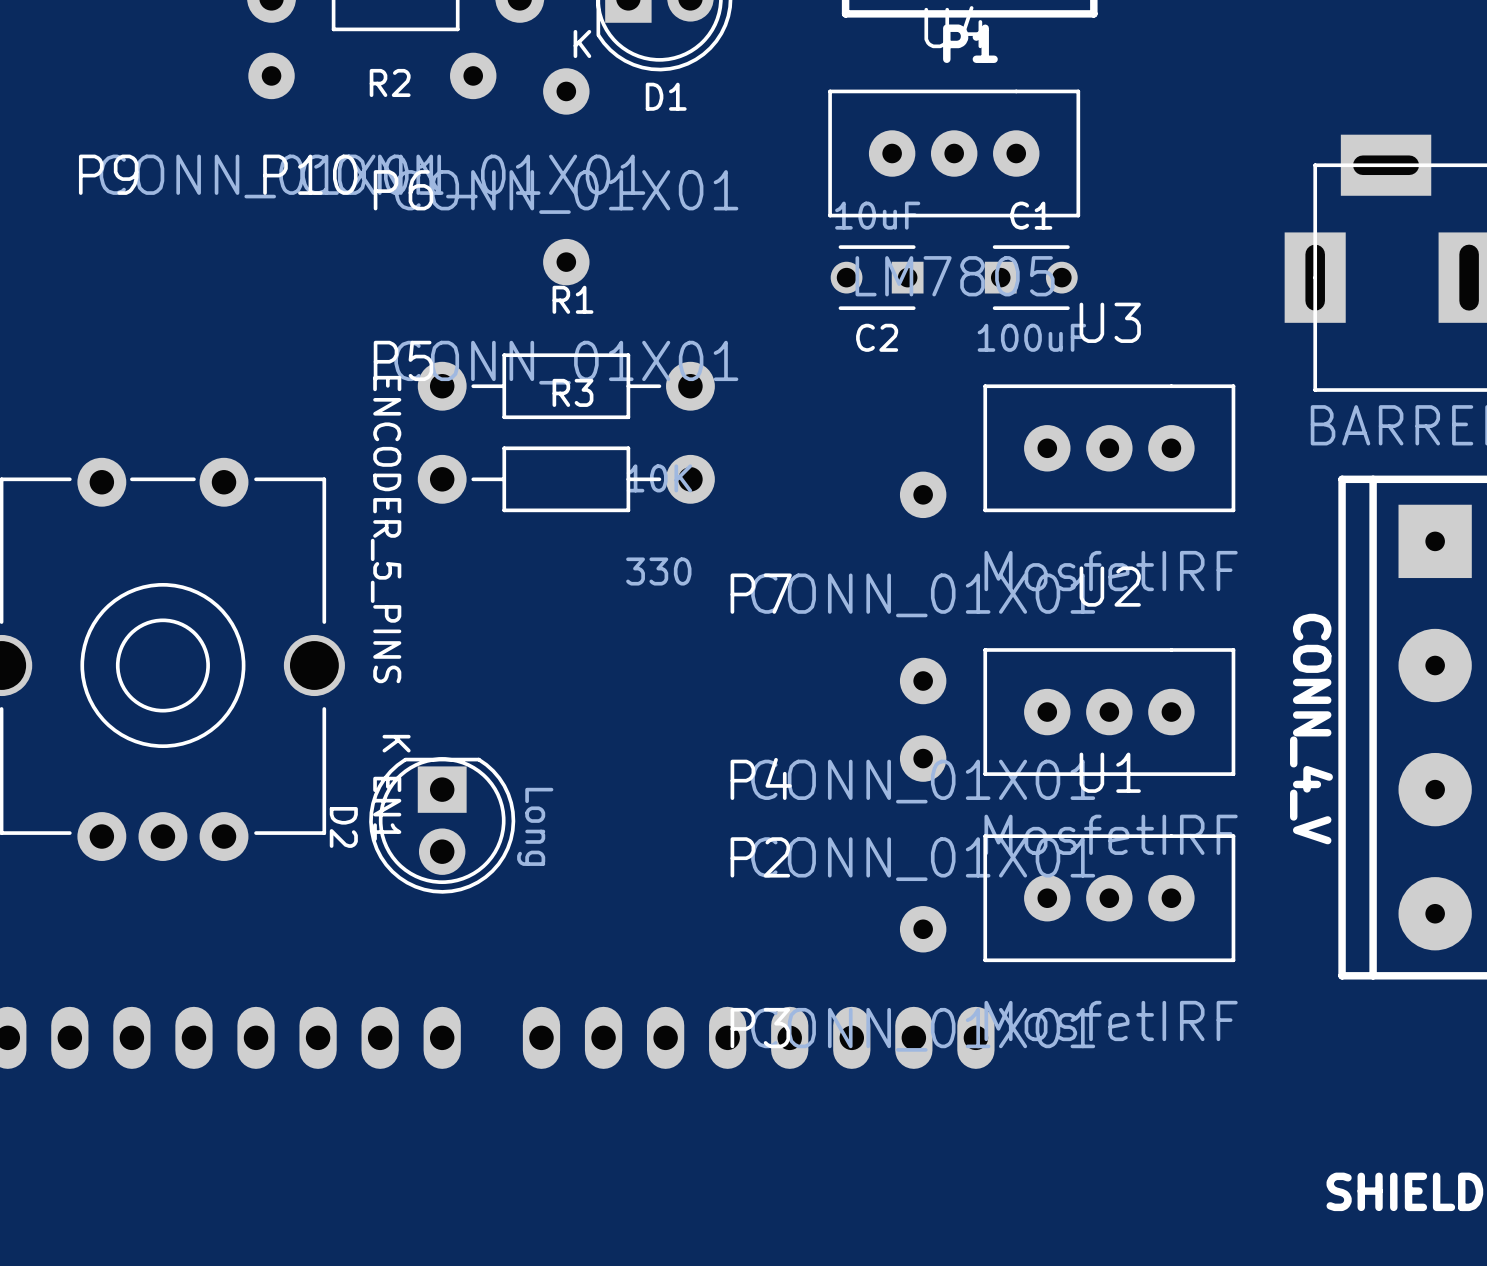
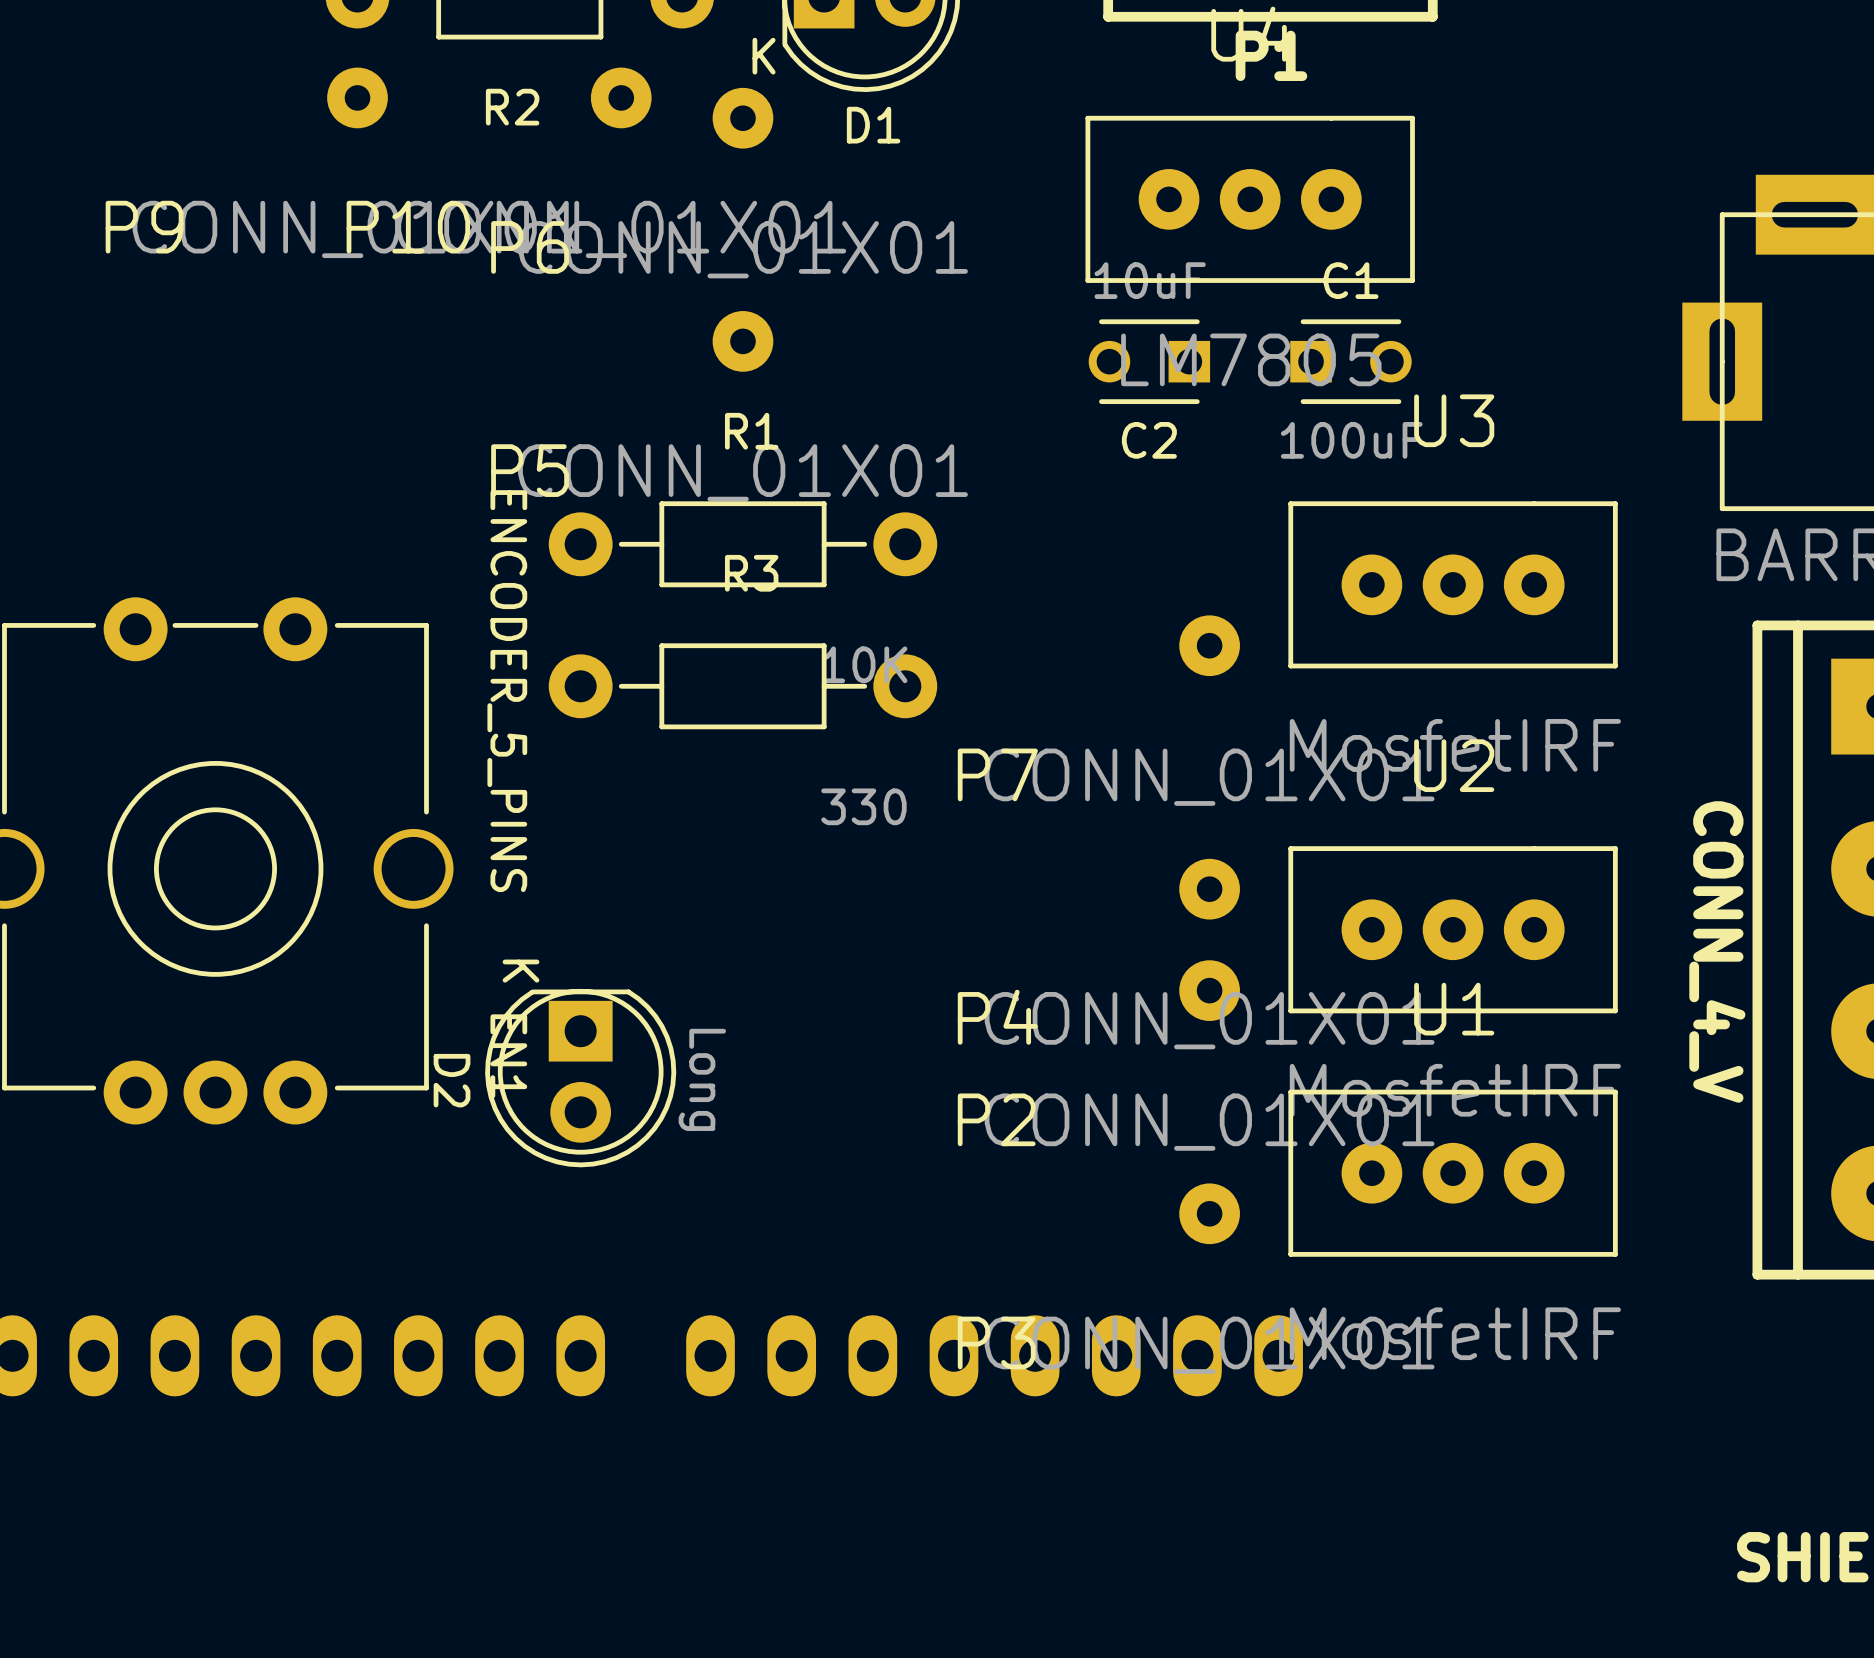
R1 position: (566, 386) -> (742, 544)
R3 position: (566, 479) -> (742, 686)

